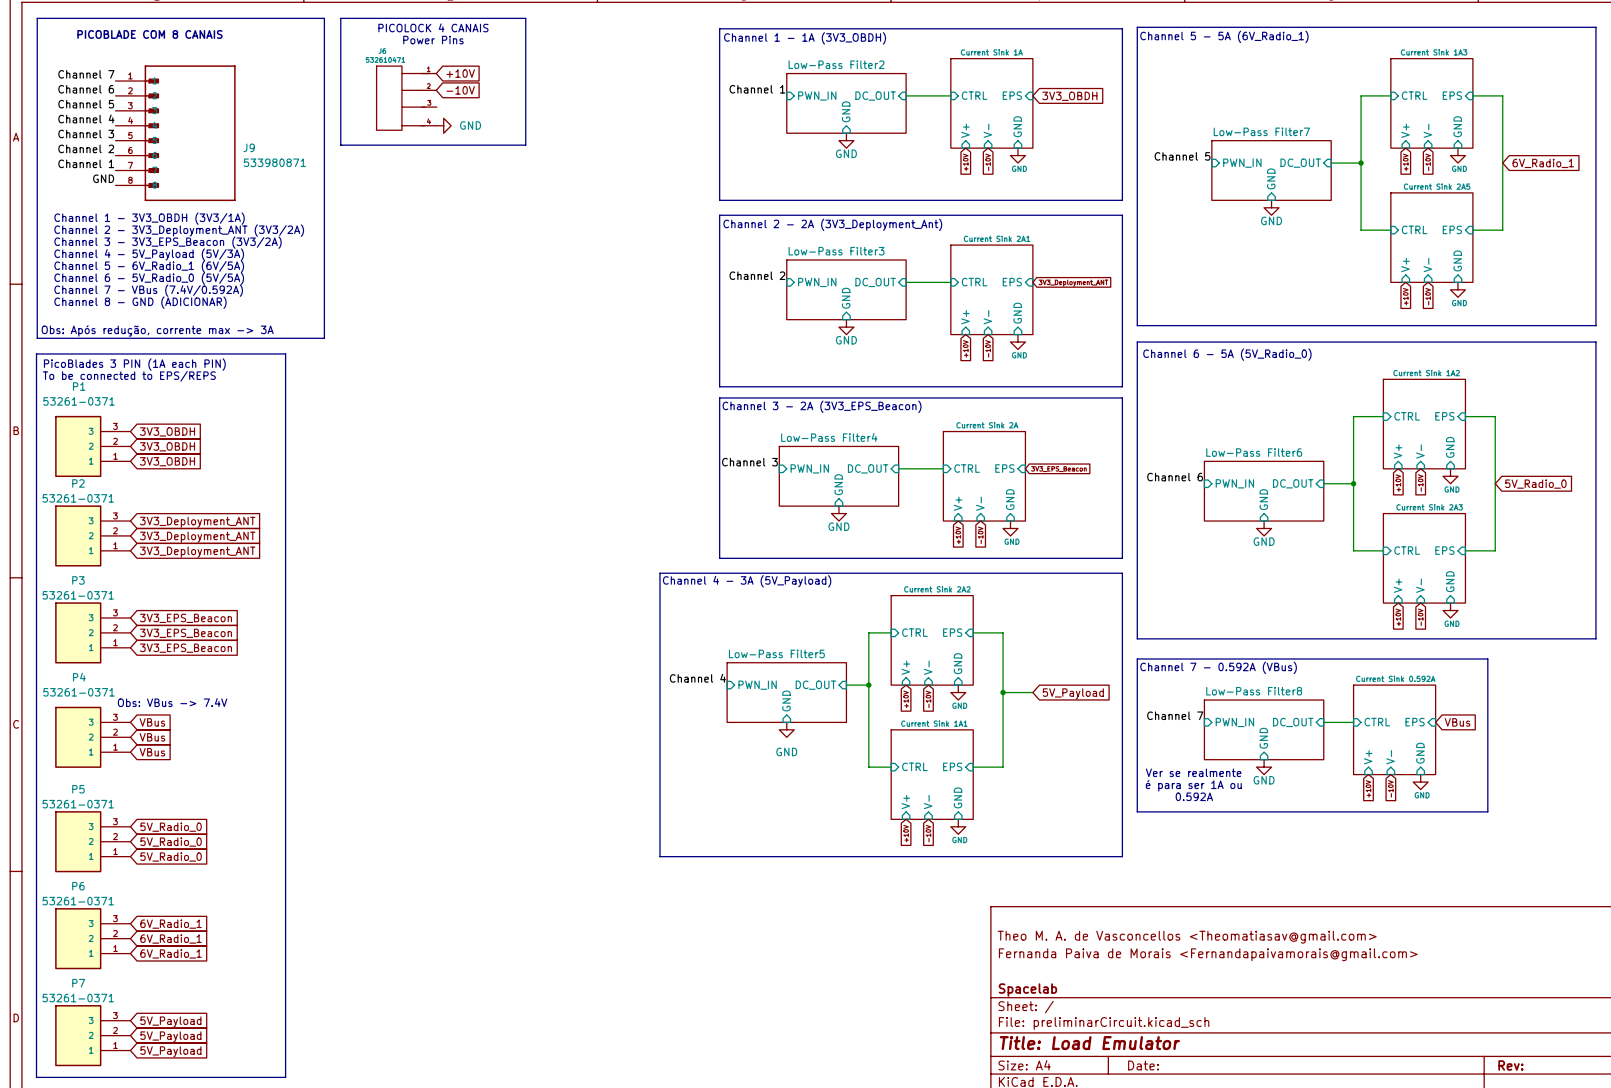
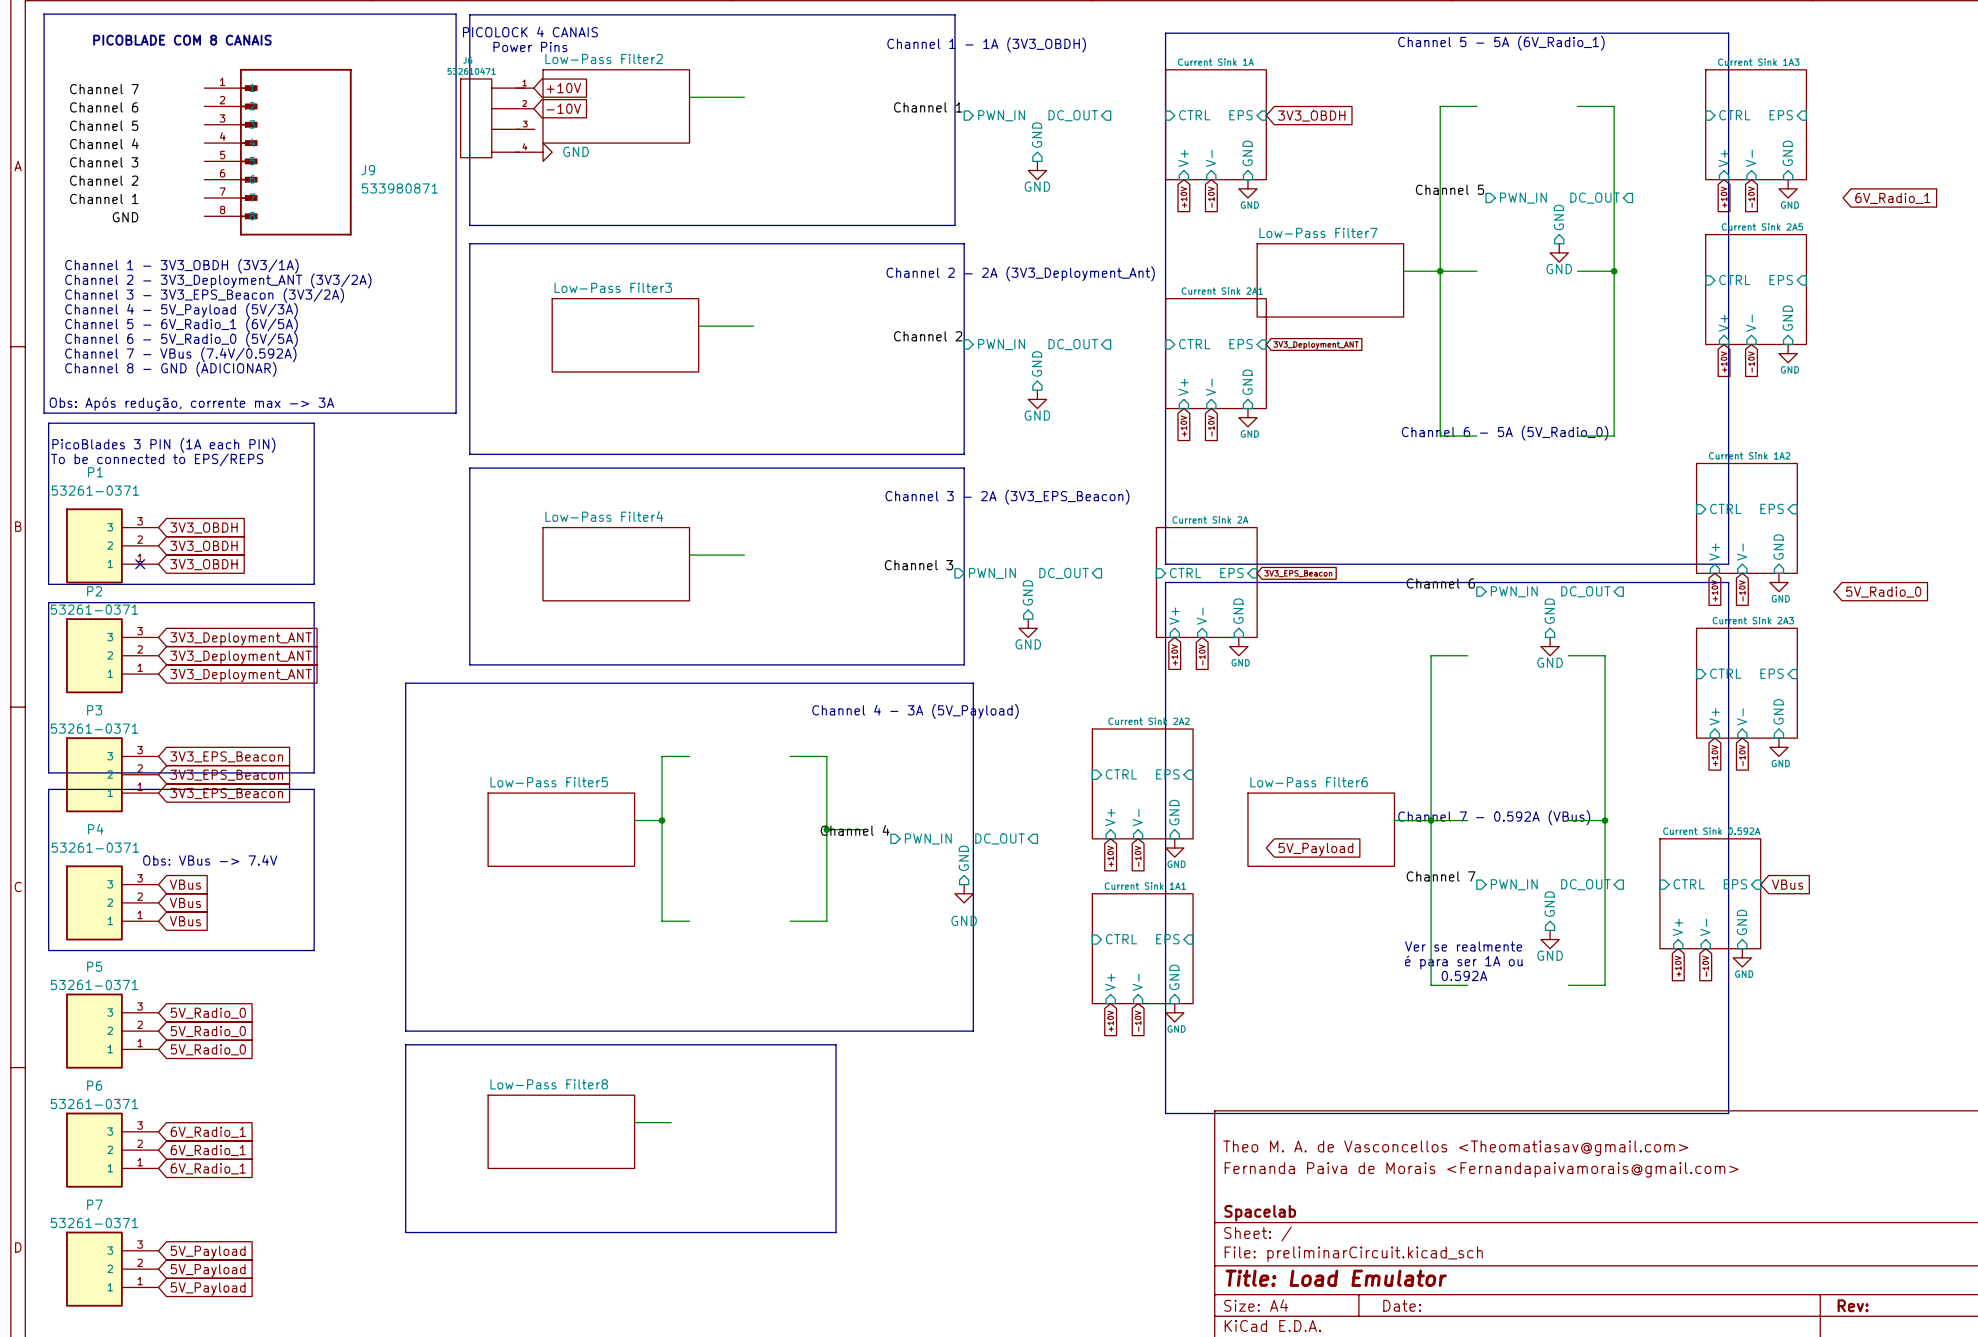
line: none -> (469, 14) (469, 225) (955, 225) (955, 14) (469, 14)
line: (340, 18) (525, 18) (525, 145) (340, 145) (340, 18) -> none
line: (1137, 27) (1137, 325) (1595, 325) (1595, 27) (1137, 27) -> none
line: (950, 28) (719, 28) (719, 200) -> (964, 243) (964, 454) (469, 454) (469, 243) (881, 243)
line: (1122, 28) (1122, 200) (786, 200) -> (1376, 33) (1728, 33) (1728, 564) (1165, 564) (1165, 33)
wire: none -> (689, 97) (744, 97)
wire: none -> (1476, 106) (1440, 106) (1440, 436) (1476, 436)
wire: none -> (1577, 106) (1614, 106) (1614, 436) (1577, 436)
wire: (906, 95) (950, 95) -> none
wire: (1390, 95) (1361, 95) (1361, 230) (1390, 230) -> none
wire: (1472, 95) (1502, 95) (1502, 230) (1472, 230) -> none
sheet Low-Pass Filter2 position: (846, 103) -> (616, 106)
J9 position: (175, 133) -> (277, 152)
wire: (1331, 163) (1361, 163) -> (1577, 271) (1614, 271)
junction: (1361, 163) -> none
sheet Low-Pass Filter7 position: (1271, 170) -> (1330, 280)
line: (719, 215) (719, 386) (1122, 386) (1122, 215) (719, 215) -> none
wire: none -> (1403, 271) (1476, 271)
junction: none -> (1440, 271)
junction: none -> (1614, 271)
wire: none -> (698, 326) (753, 326)
wire: (906, 282) (950, 282) -> none
sheet Low-Pass Filter3 position: (846, 289) -> (625, 335)
line: (37, 338) (37, 18) (324, 18) (324, 338) -> (44, 413) (44, 14) (456, 14) (456, 413) (396, 413)
line: (1137, 342) (1137, 638) (1595, 638) (1595, 342) (1137, 342) -> none
line: none -> (48, 423) (48, 584) (314, 584) (314, 423) (48, 423)
line: (36, 353) (285, 353) (285, 1077) (36, 1077) (36, 353) -> none
line: none -> (469, 468) (964, 468) (964, 664) (469, 664) (469, 468)
wire: (1383, 416) (1353, 416) (1353, 550) (1383, 550) -> none
wire: (1465, 416) (1495, 416) (1495, 550) (1465, 550) -> none
wire: none -> (689, 555) (744, 555)
no-connect mark: none -> (140, 564)
wire: (898, 468) (943, 468) -> none
sheet Low-Pass Filter4 position: (838, 476) -> (616, 564)
line: none -> (1165, 582) (1165, 1113) (1728, 1113) (1728, 582) (1165, 582)
wire: (1323, 483) (1353, 483) -> none
junction: (1353, 483) -> none
sheet Low-Pass Filter6 position: (1264, 491) -> (1321, 829)
line: none -> (48, 602) (314, 602) (314, 772) (48, 772) (48, 602)
wire: none -> (1467, 655) (1431, 655) (1431, 985) (1467, 985)
wire: none -> (1568, 655) (1605, 655) (1605, 985) (1568, 985)
line: (719, 558) (719, 397) (1122, 397) (1122, 558) (794, 558) -> (881, 683) (405, 683) (405, 1031) (973, 1031) (973, 683)
line: (659, 573) (1122, 573) (1122, 856) (659, 856) (659, 573) -> none
wire: none -> (689, 756) (662, 756) (662, 921) (689, 921)
wire: none -> (790, 756) (826, 756) (826, 921) (790, 921)
wire: (891, 632) (868, 632) (868, 767) (891, 767) -> none
wire: (973, 632) (1003, 632) (1003, 767) (973, 767) -> none
line: none -> (48, 789) (48, 950) (314, 950) (314, 789) (48, 789)
line: (1137, 659) (1487, 659) (1487, 811) (1137, 811) (1137, 659) -> none
wire: none -> (634, 820) (662, 820)
junction: none -> (662, 820)
wire: none -> (1394, 820) (1467, 820)
junction: none -> (1431, 820)
junction: none -> (1605, 820)
wire: none -> (826, 829) (863, 829)
junction: none -> (826, 829)
wire: (846, 685) (868, 685) -> none
junction: (868, 685) -> none
sheet Low-Pass Filter5 position: (786, 692) -> (561, 829)
wire: (1003, 692) (1032, 692) -> none
junction: (1003, 692) -> none
wire: (1323, 722) (1353, 722) -> (1568, 820) (1605, 820)
sheet Low-Pass Filter8 position: (1264, 729) -> (561, 1131)
line: none -> (405, 1044) (835, 1044) (835, 1232) (405, 1232) (405, 1044)
wire: none -> (634, 1122) (671, 1122)

